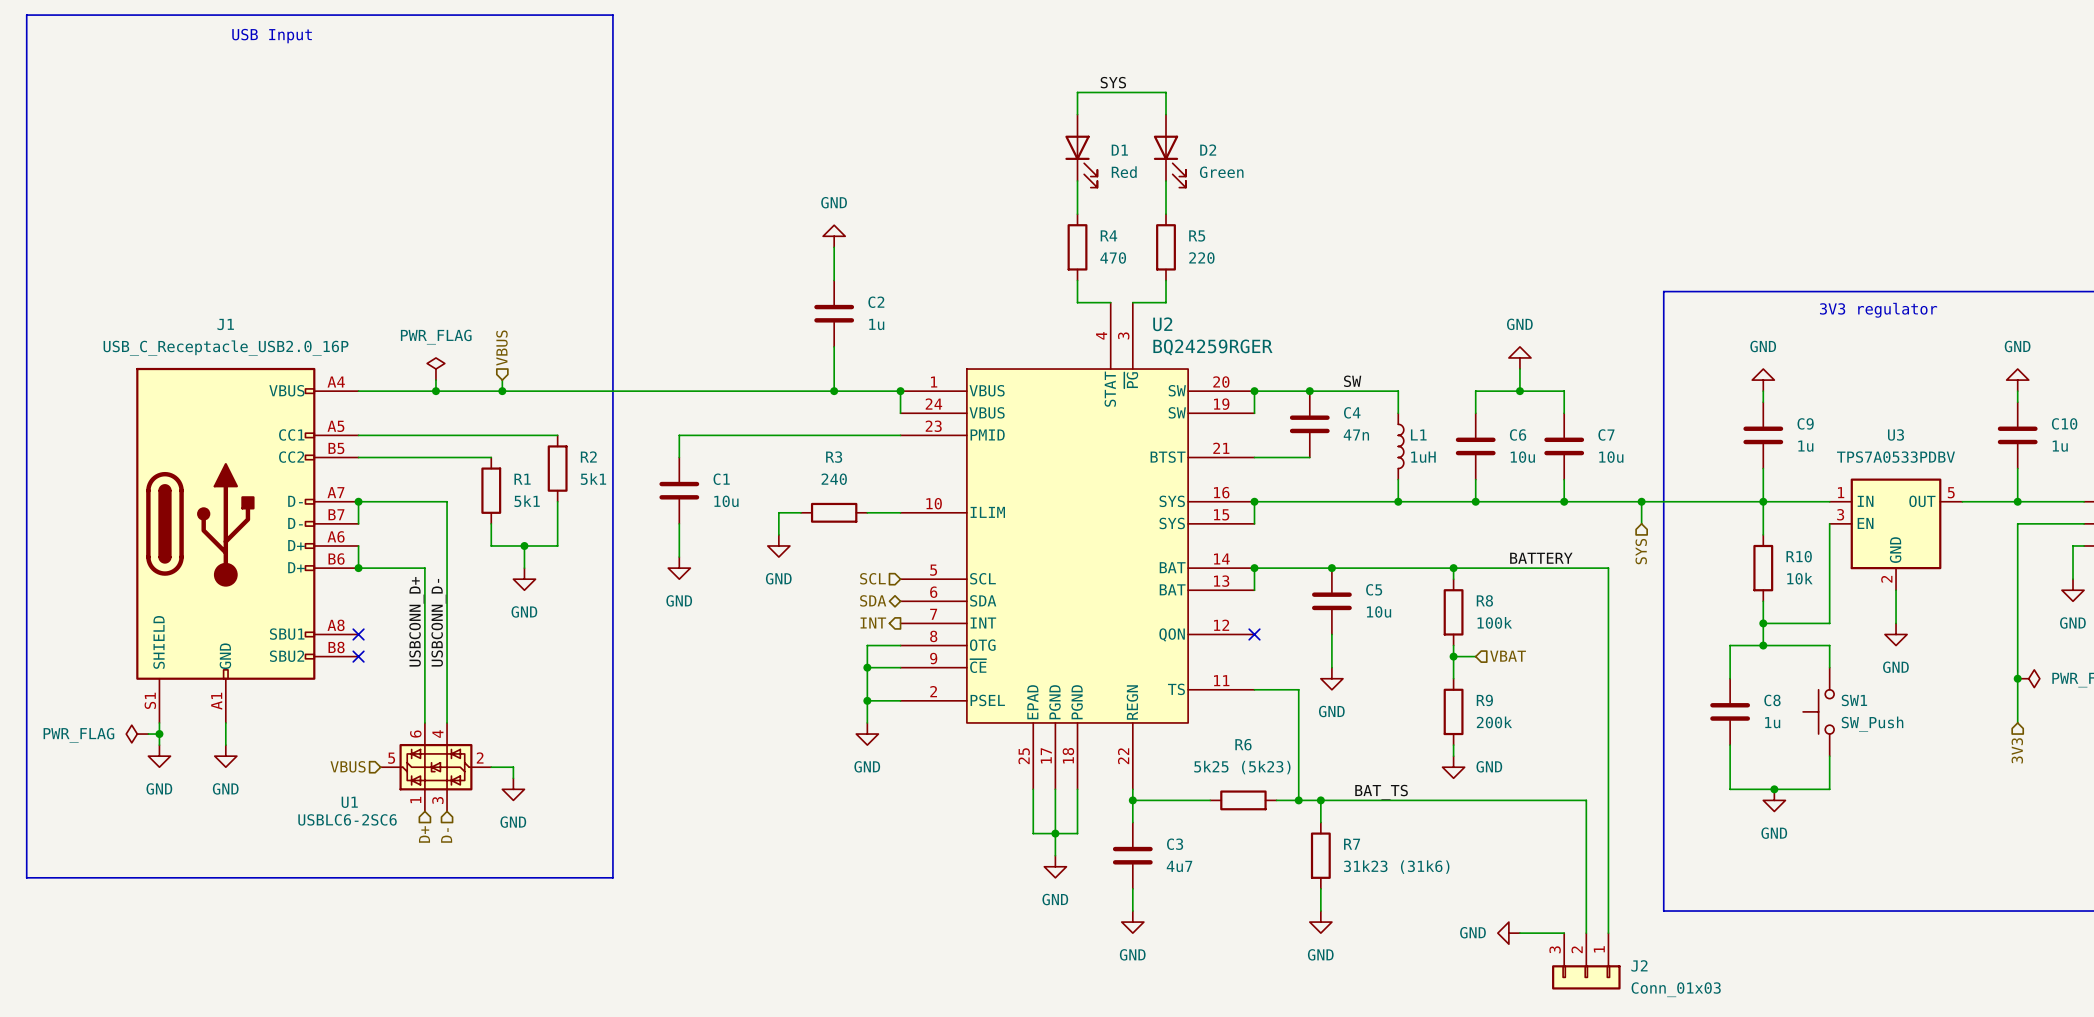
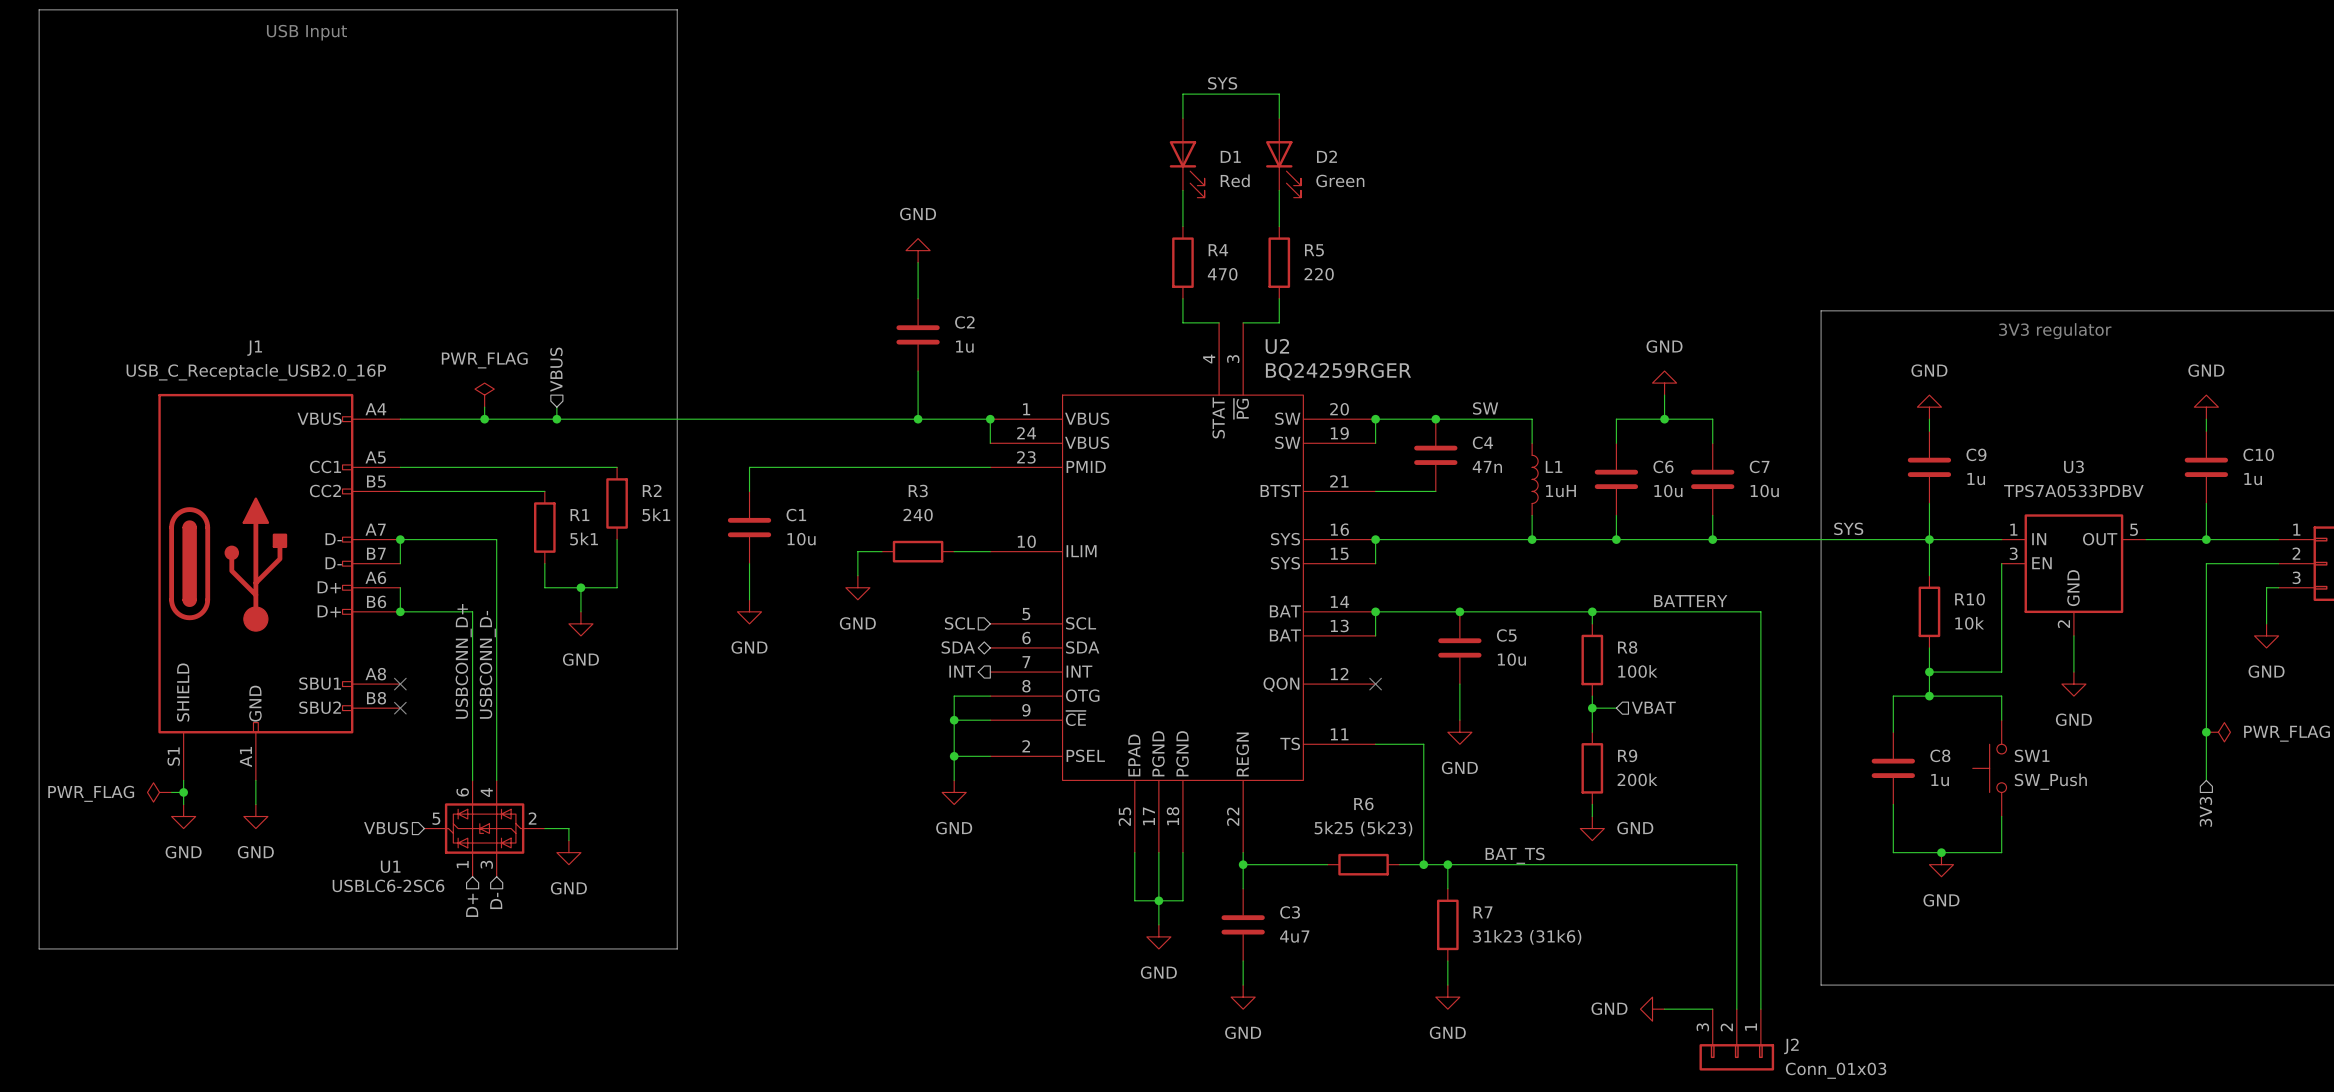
label: none -> SYS (1848, 528)
wire: (1641, 501) (1641, 523) -> none
junction: (1641, 501) -> none
hierarchical label: SYS (1641, 551) -> none

